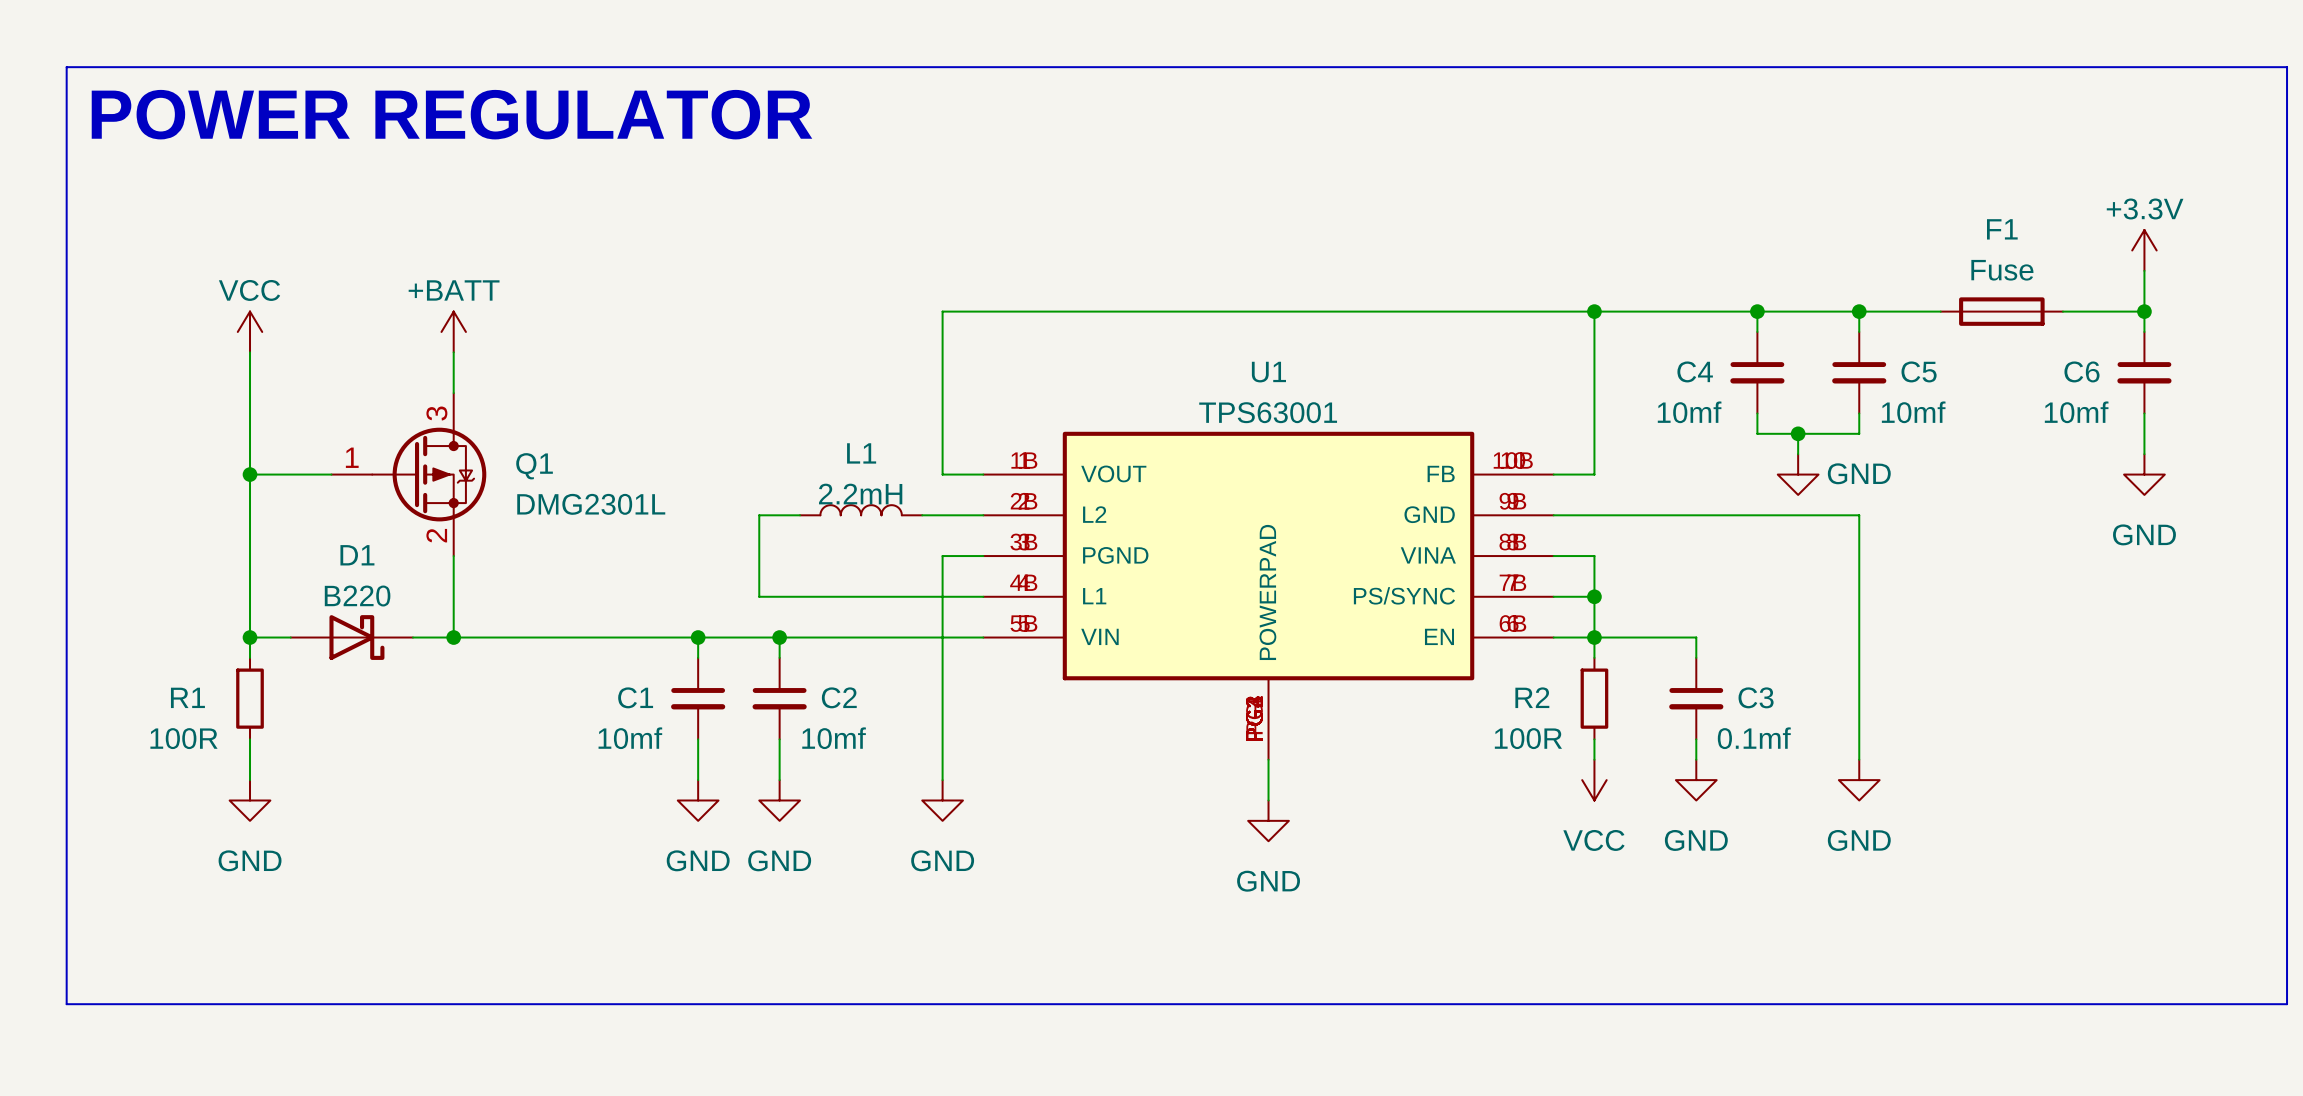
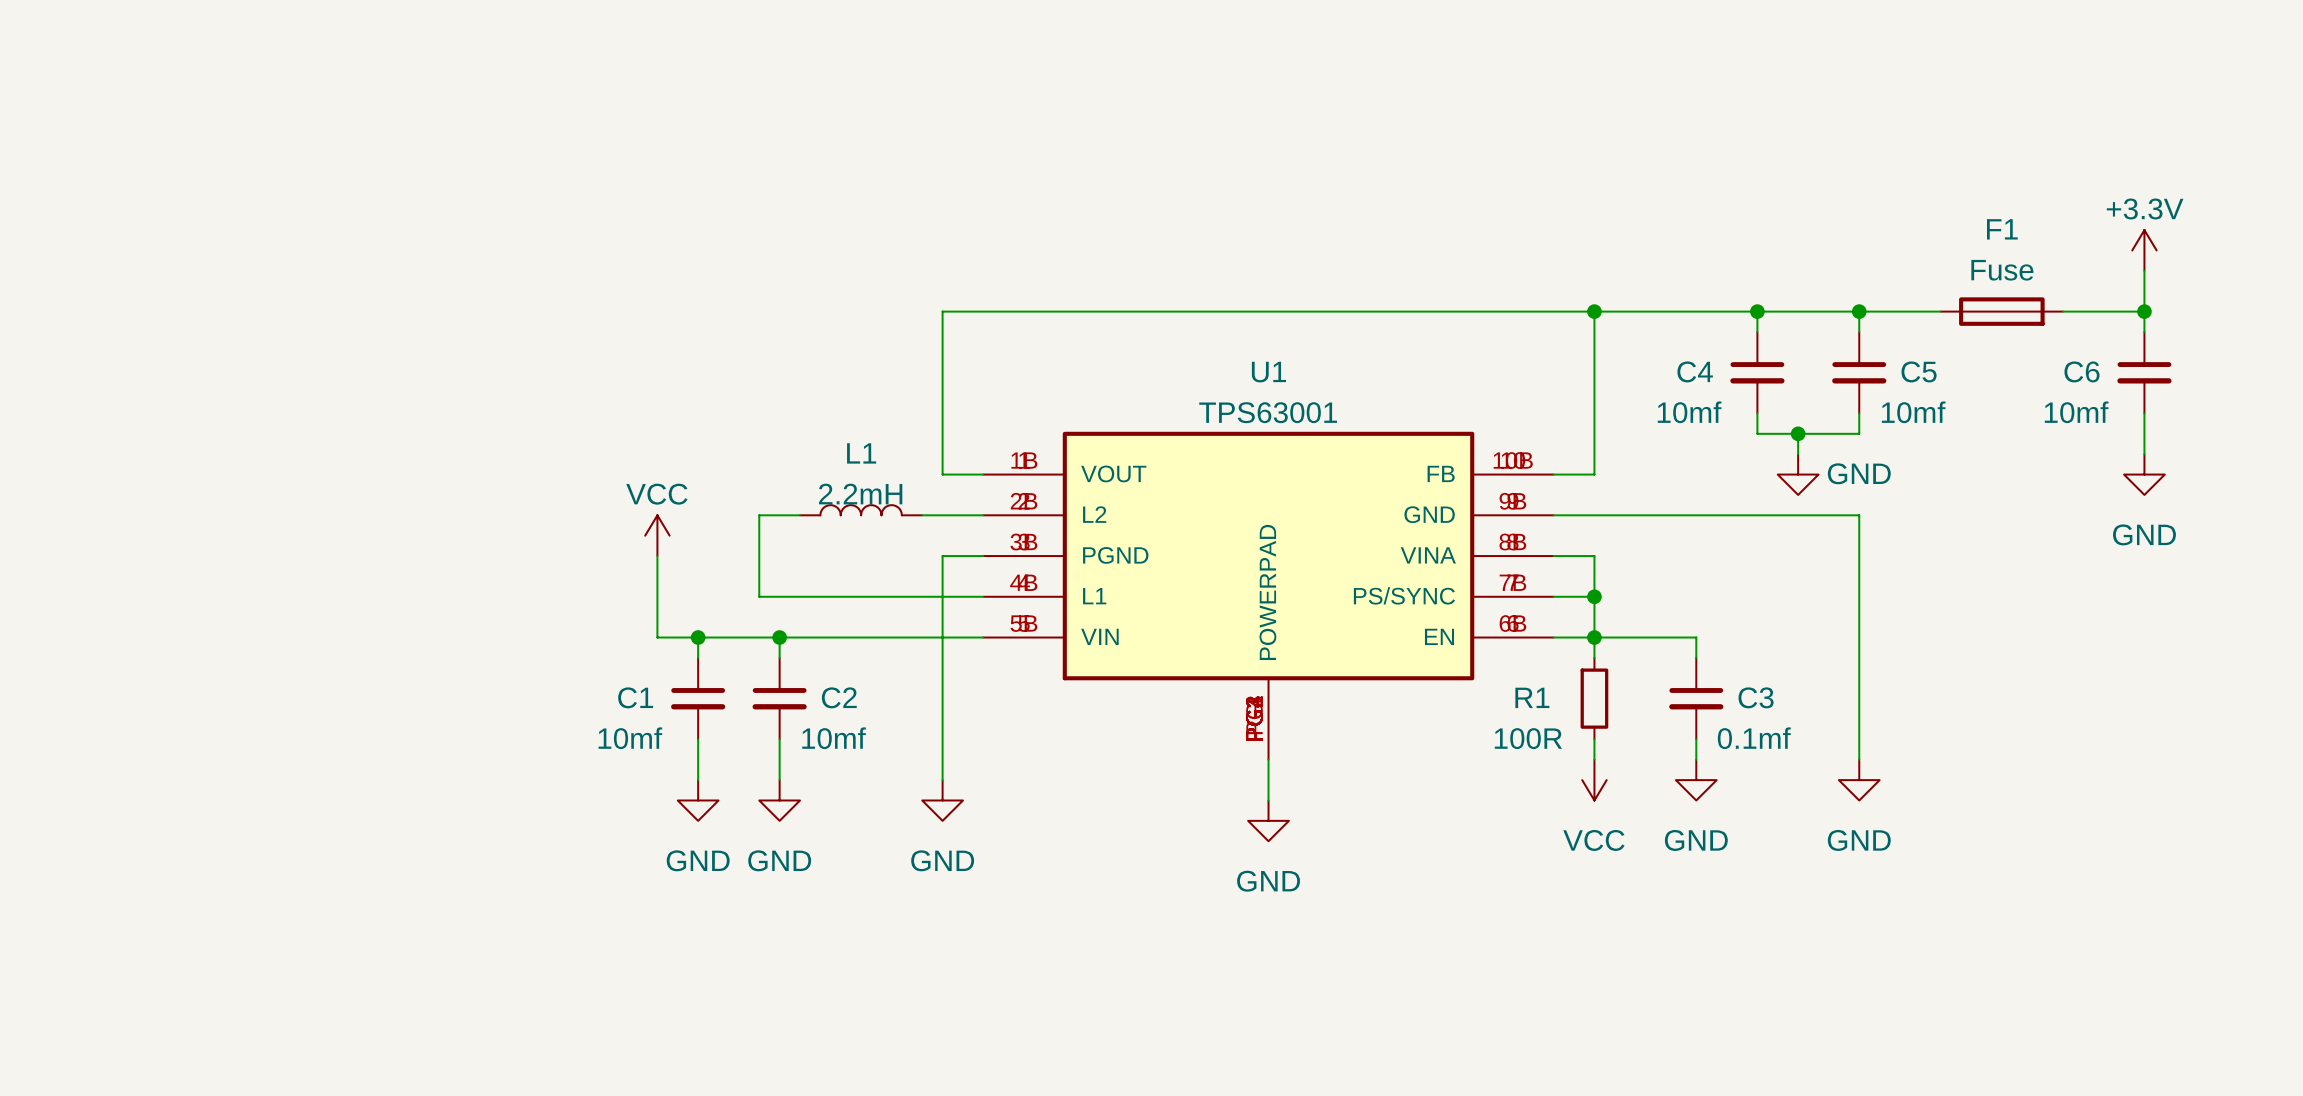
line: (66, 67) (2287, 67) (2287, 1004) (66, 1004) (66, 67) -> none
text: POWER REGULATOR (451, 114) -> none
power symbol: VCC (250, 331) -> none
power symbol: +BATT (453, 331) -> none
wire: (250, 352) (250, 657) -> none
wire: (453, 352) (453, 393) -> none
wire: (250, 474) (331, 474) -> none
junction: (250, 474) -> none
Q1: DMG2301L (408, 474) -> none
power symbol: none -> VCC (657, 535)
wire: (453, 556) (453, 637) -> none
wire: (250, 637) (290, 637) -> none
junction: (250, 637) -> none
D1: B220 (351, 637) -> none
wire: (412, 637) (657, 637) -> (657, 556) (657, 637)
junction: (453, 637) -> none
R2 name: R2 (1532, 697) -> R1 (1532, 697)
R1: 100R (250, 698) -> none
wire: (250, 739) (250, 780) -> none
power symbol: GND (250, 800) -> none

